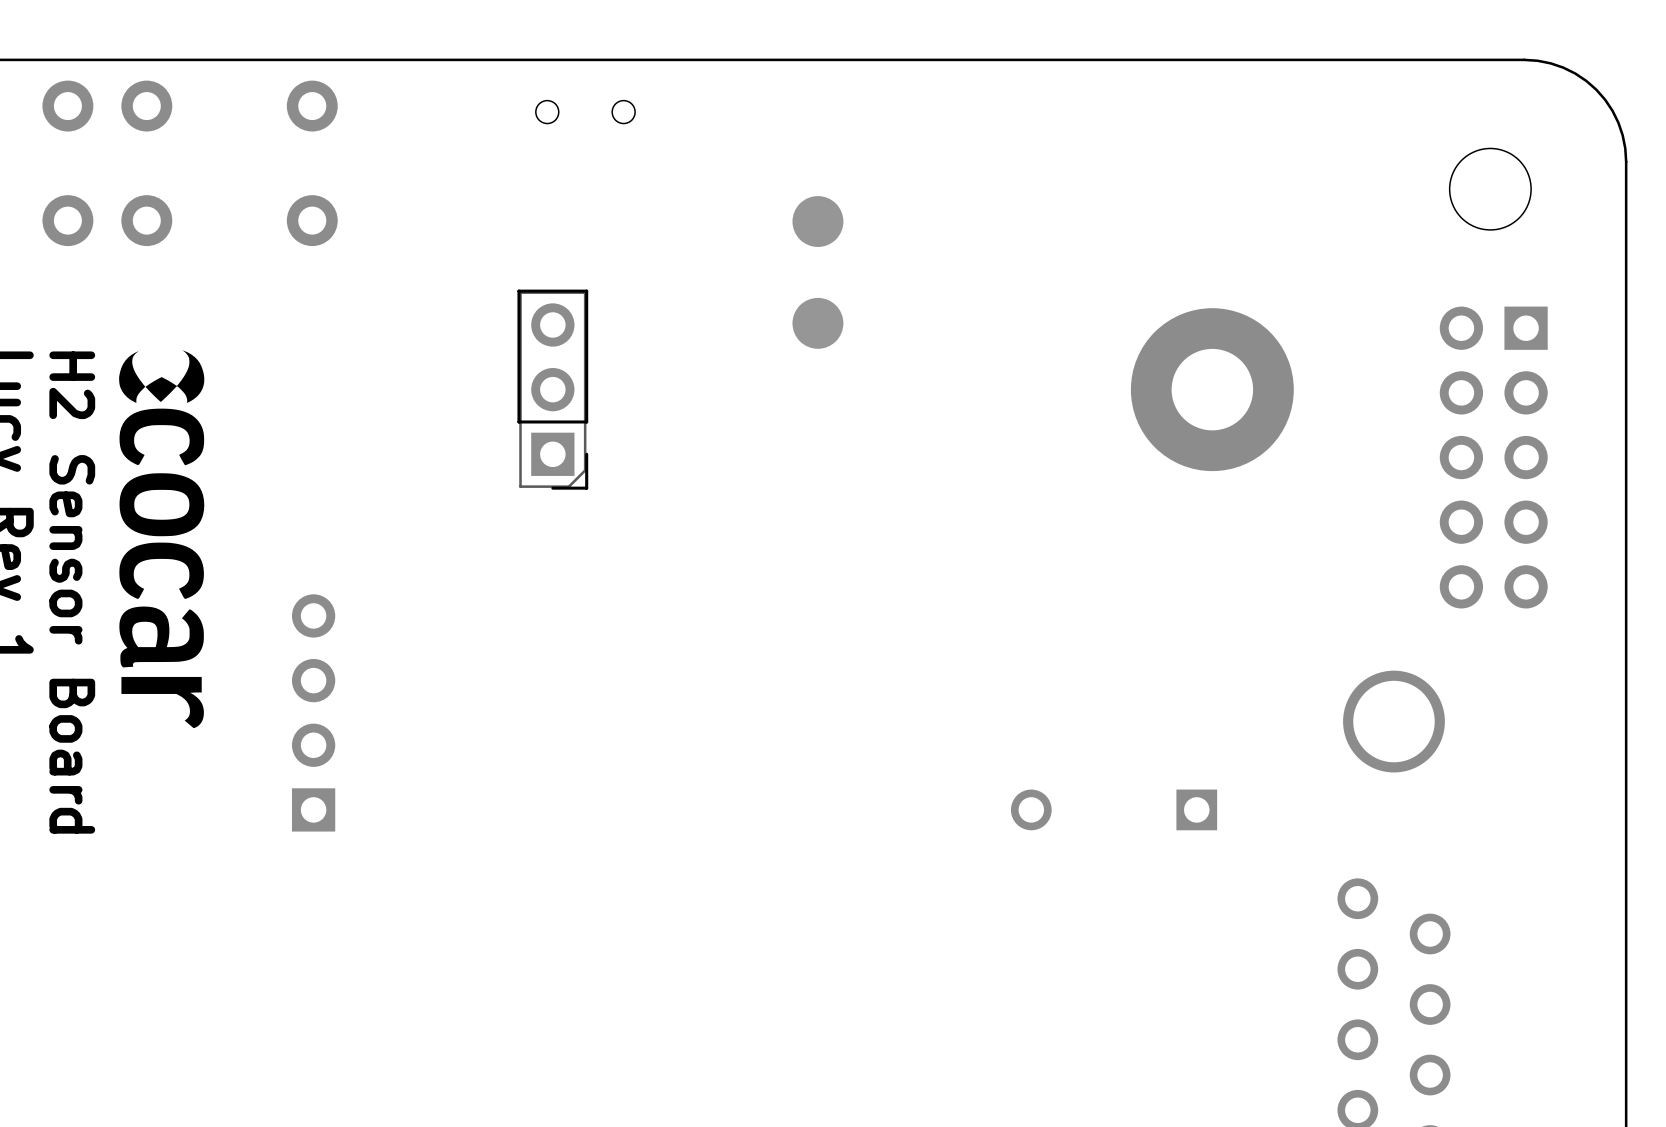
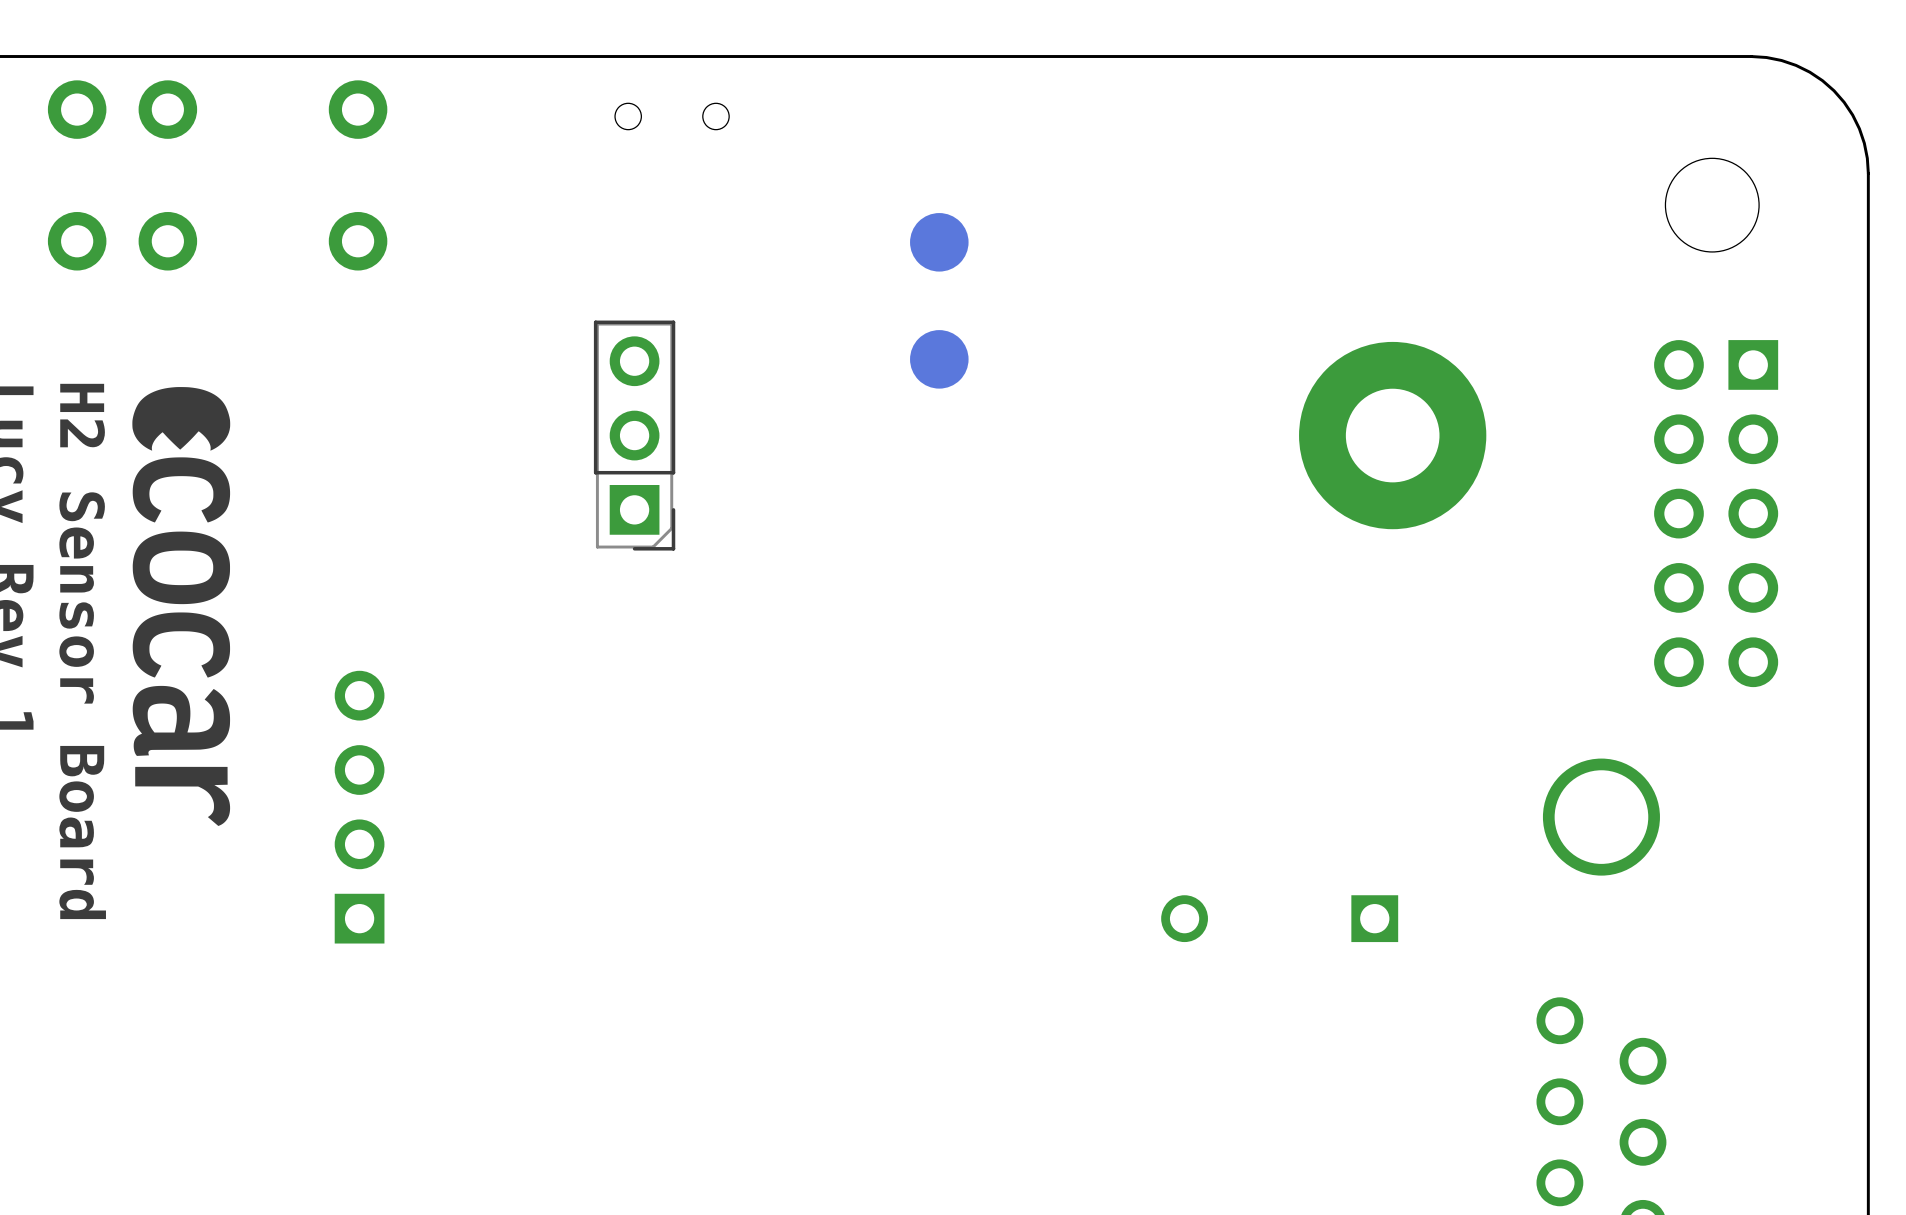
drawing: none -> [132, 387, 231, 826]
drawing: [119, 349, 205, 729] -> none

